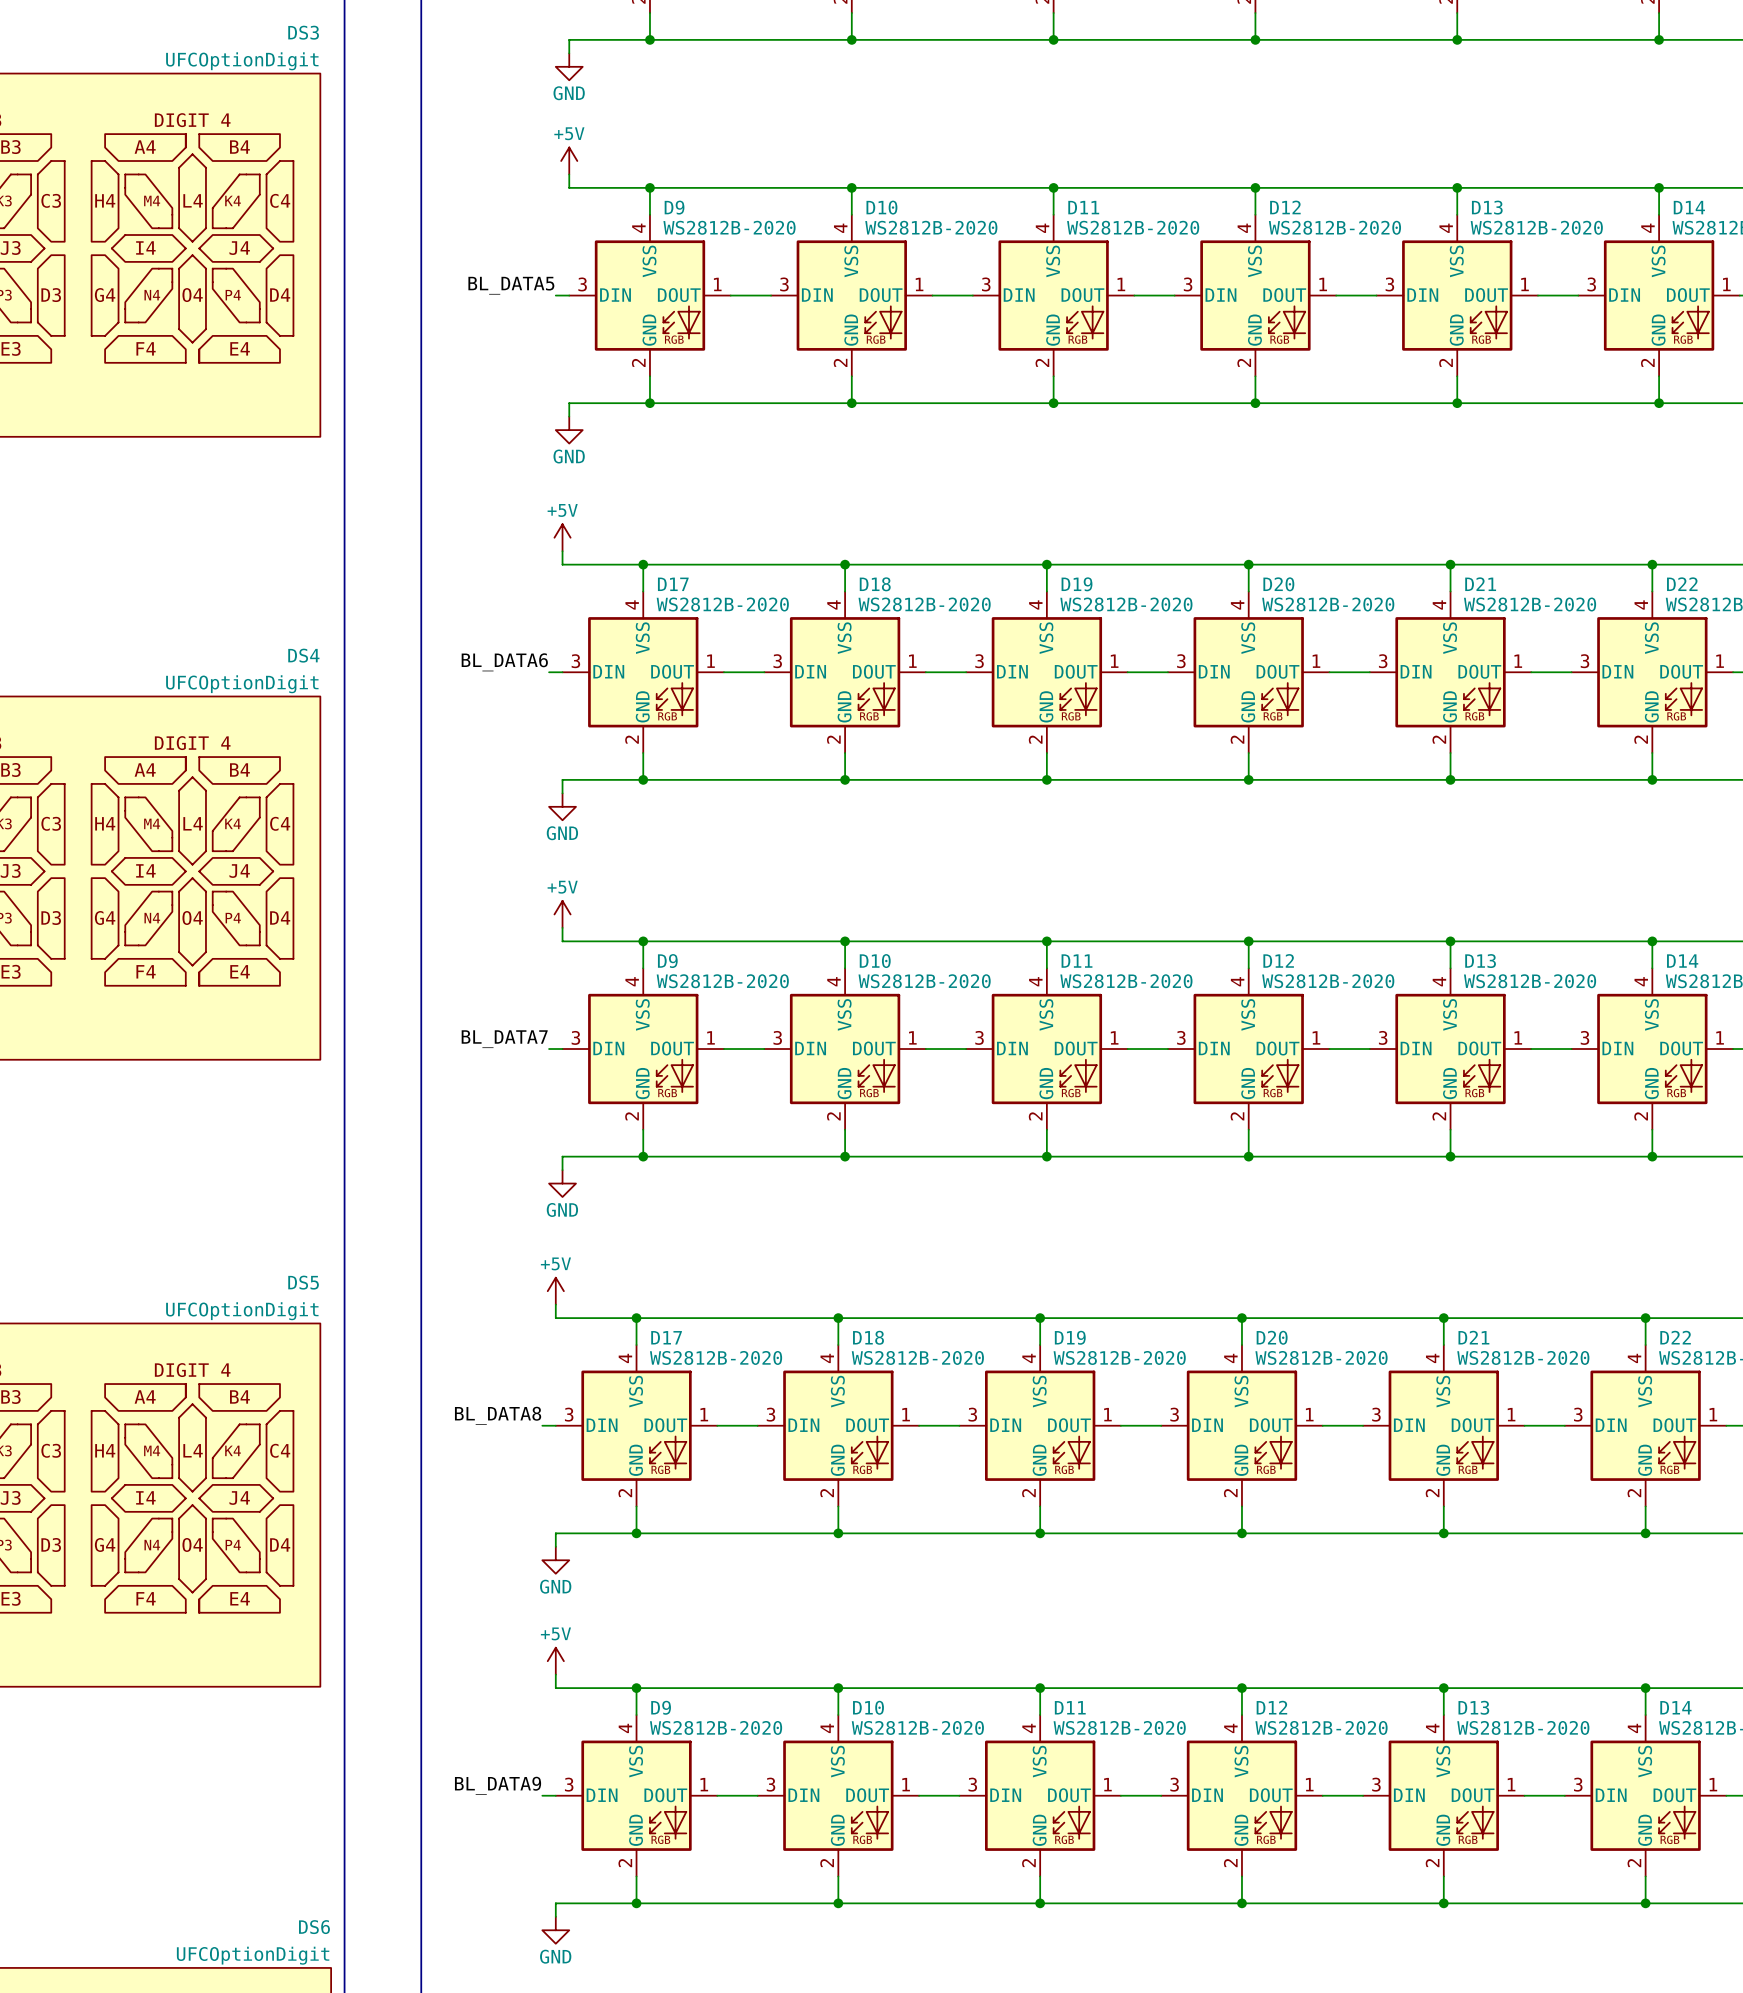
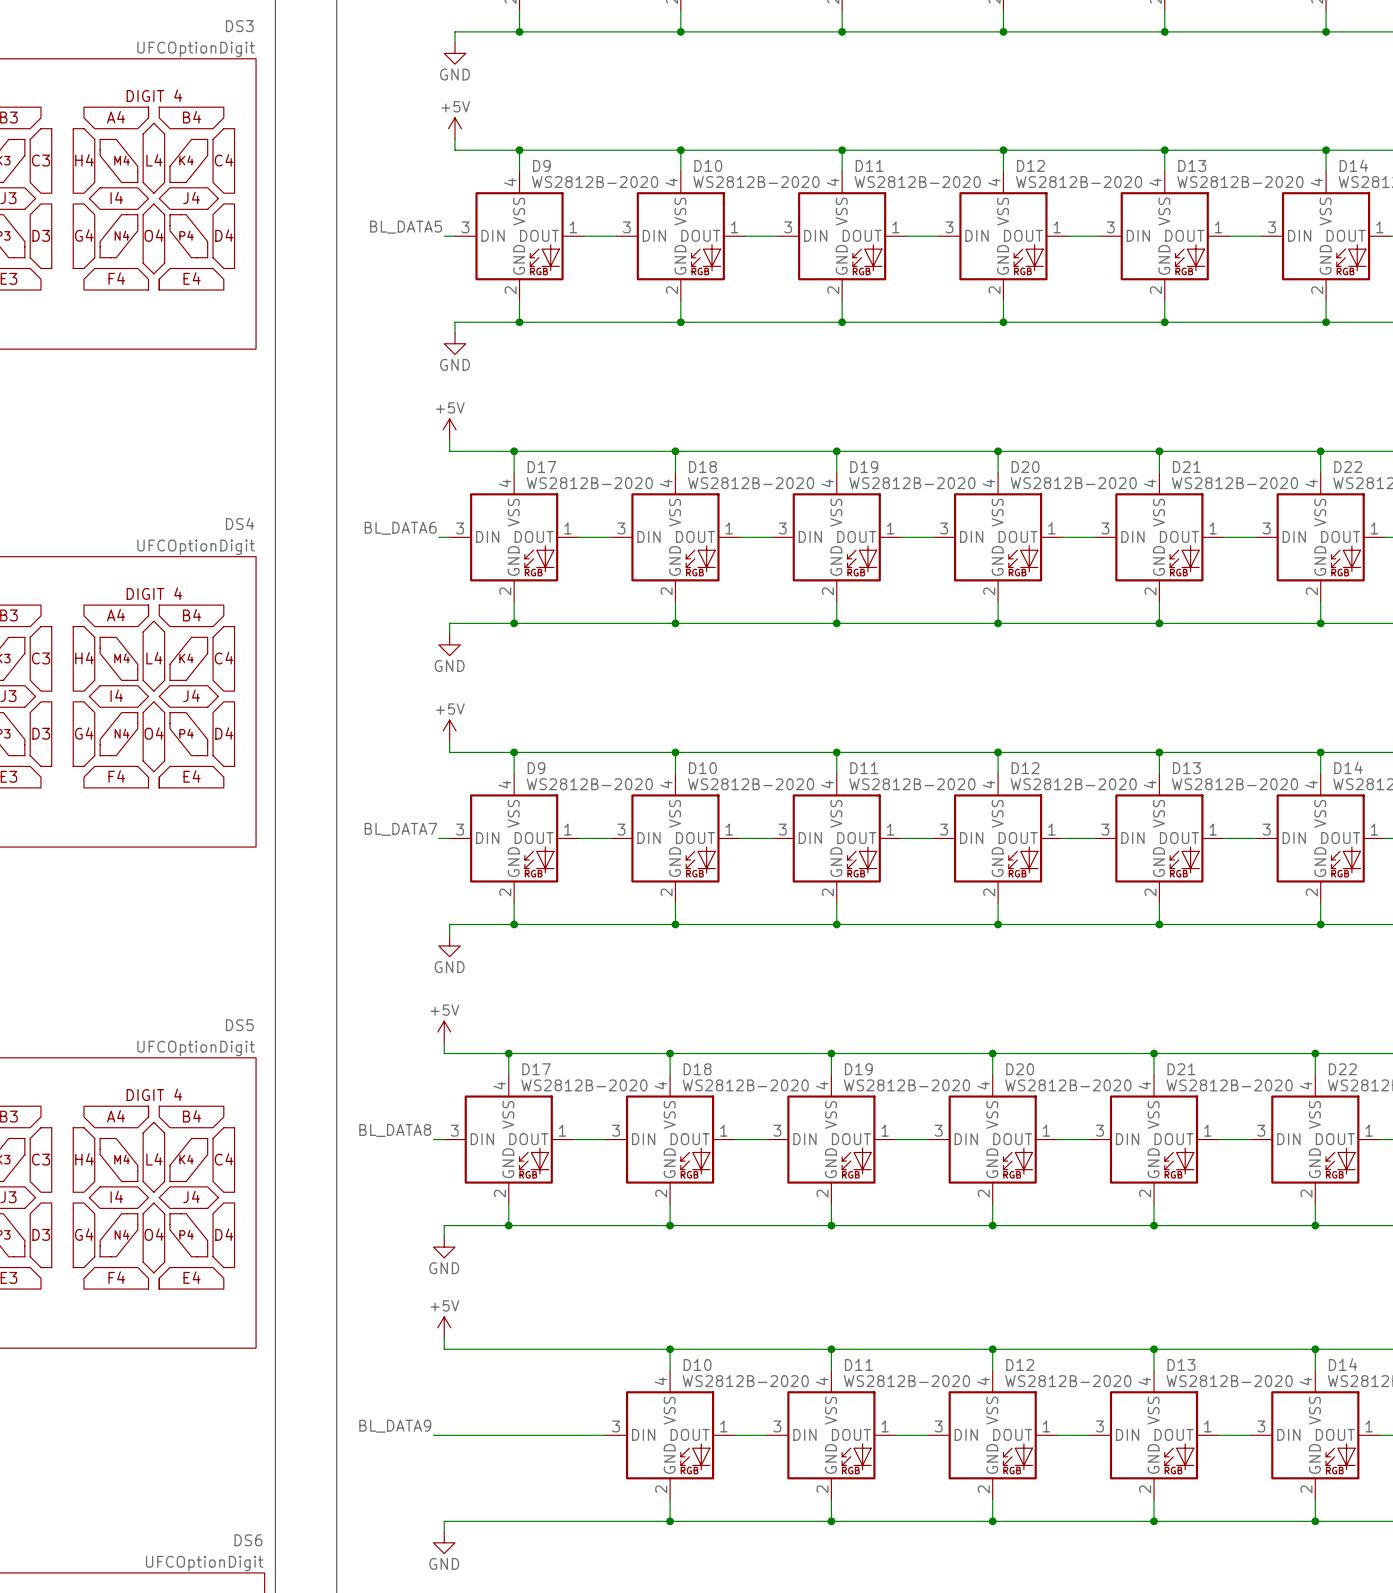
wire: (636, 1688) (636, 1715) -> none
junction: (636, 1688) -> none
D9: WS2812B-2020 (636, 1795) -> none
wire: (636, 1876) (636, 1903) -> none
junction: (636, 1903) -> none

